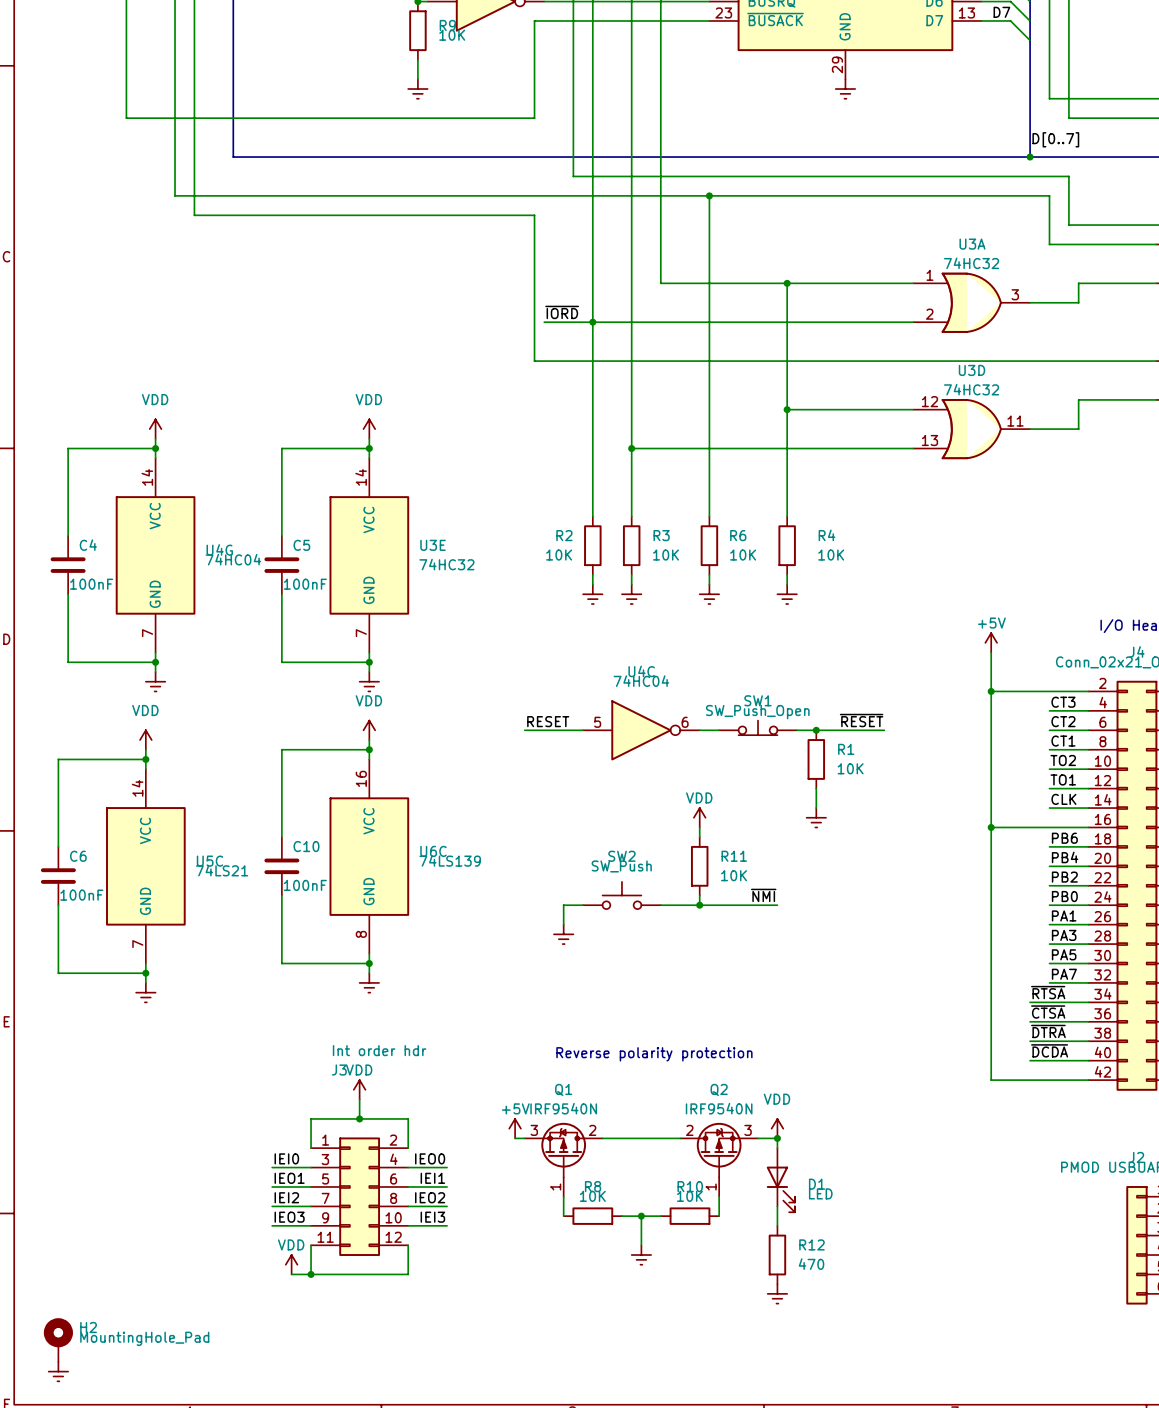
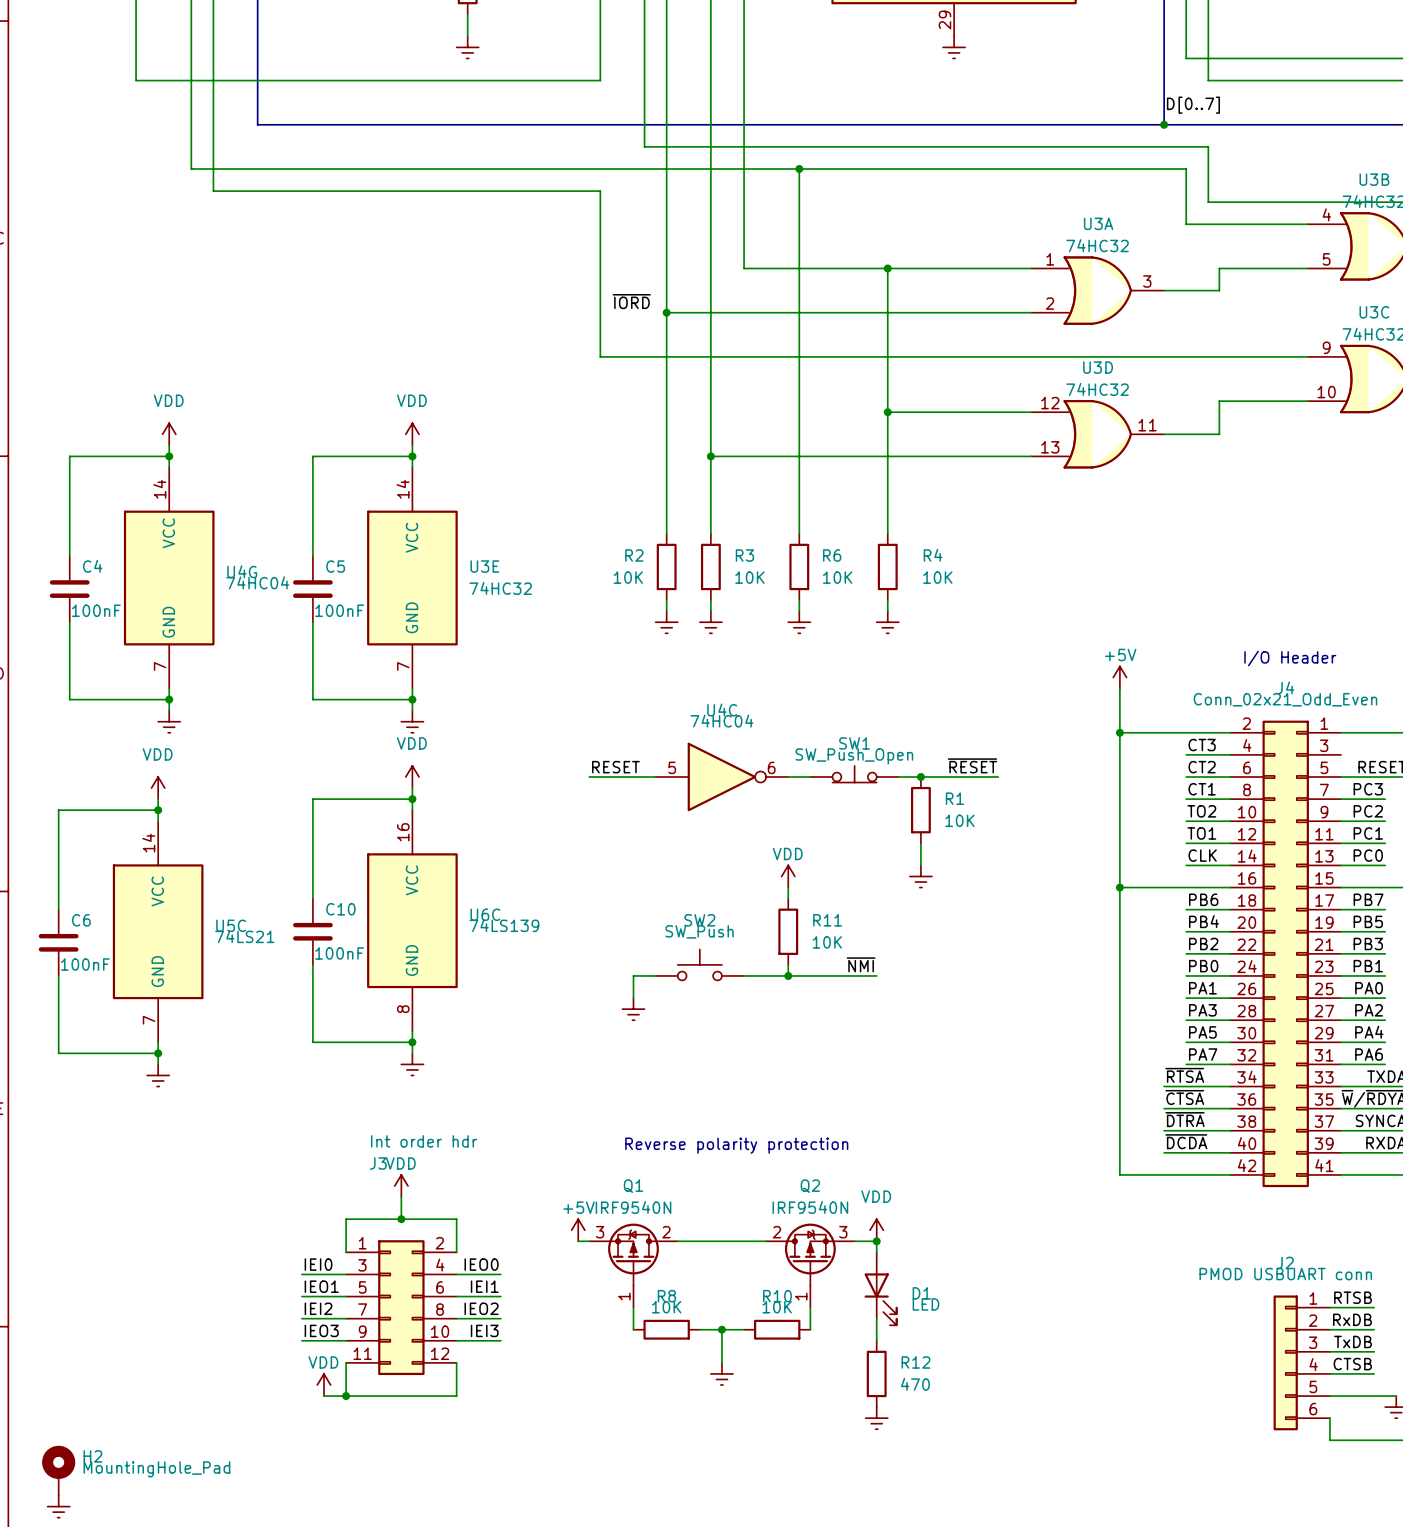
wire: (544, 322) (592, 322) -> none

